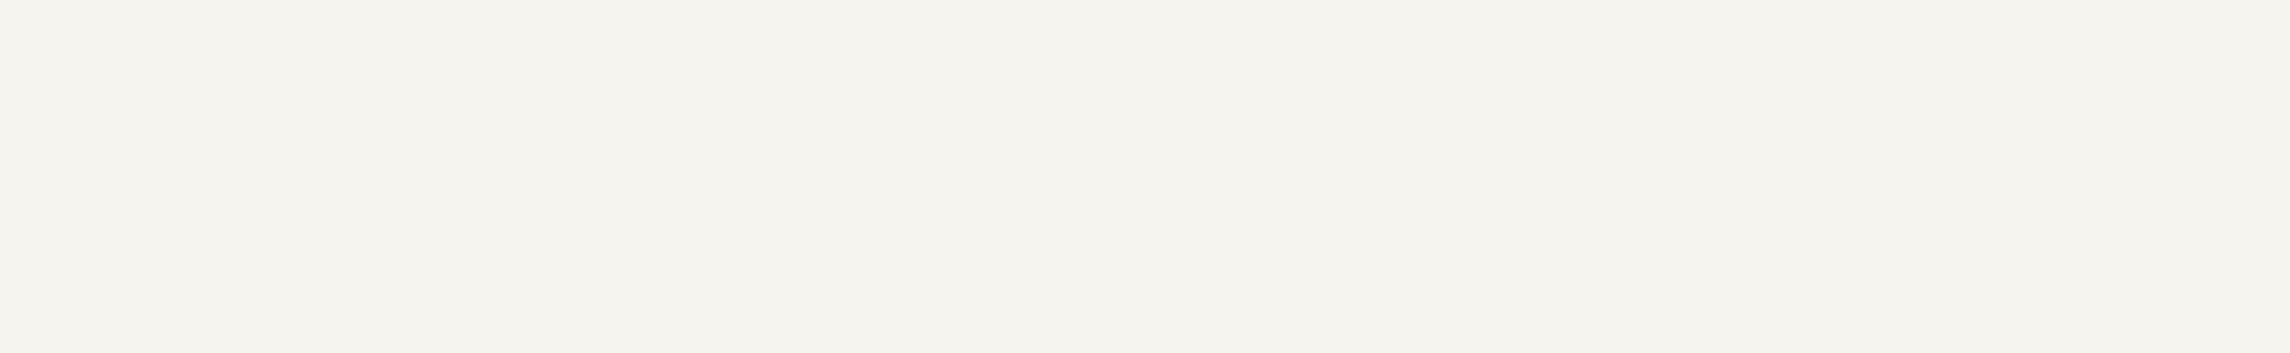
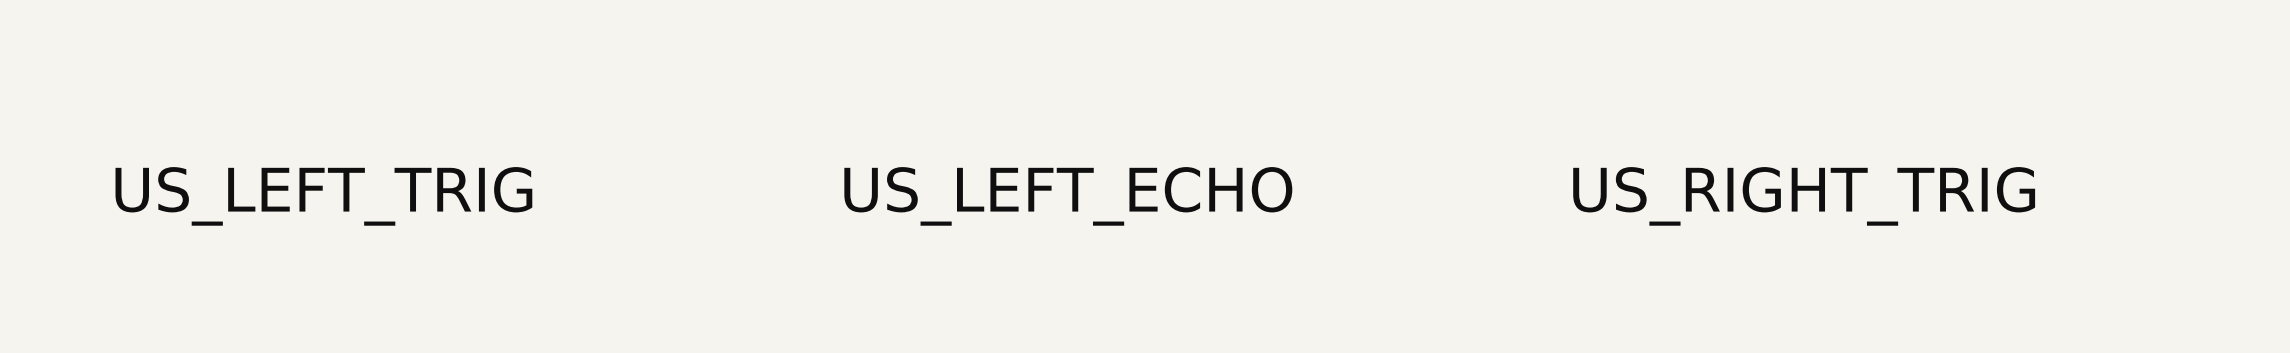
label: none -> US_LEFT_TRIG (323, 196)
label: none -> US_LEFT_ECHO (1068, 196)
label: none -> US_RIGHT_TRIG (1804, 196)

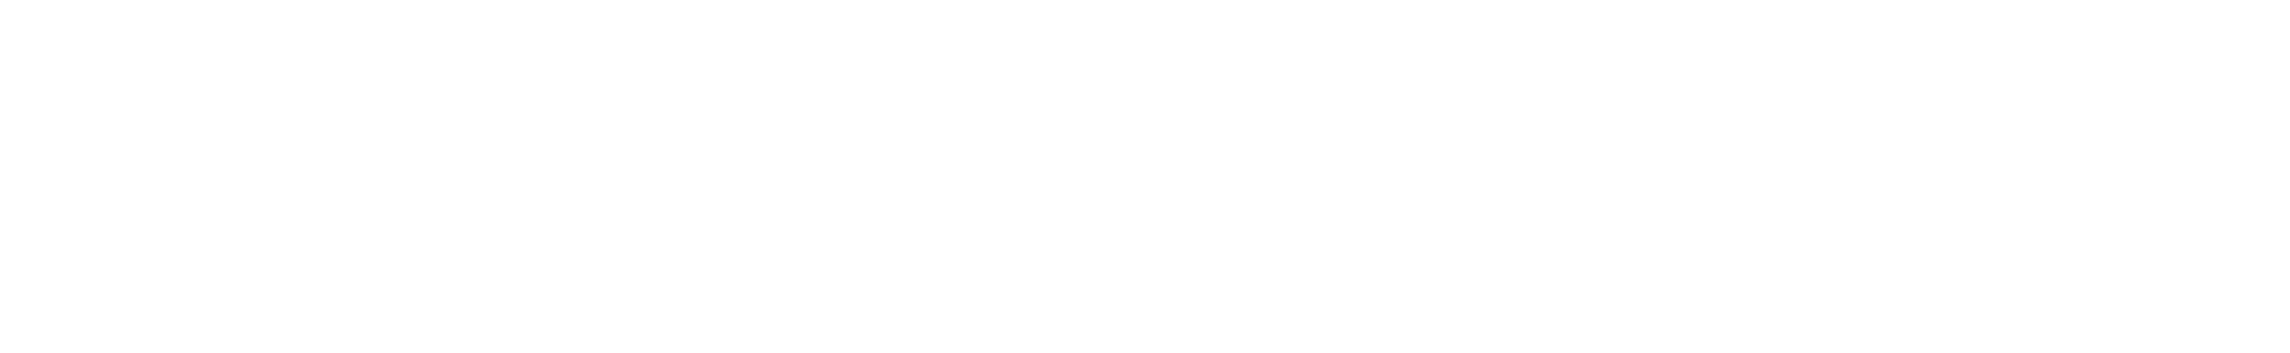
label: US_LEFT_TRIG (323, 196) -> none
label: US_LEFT_ECHO (1068, 196) -> none
label: US_RIGHT_TRIG (1804, 196) -> none

